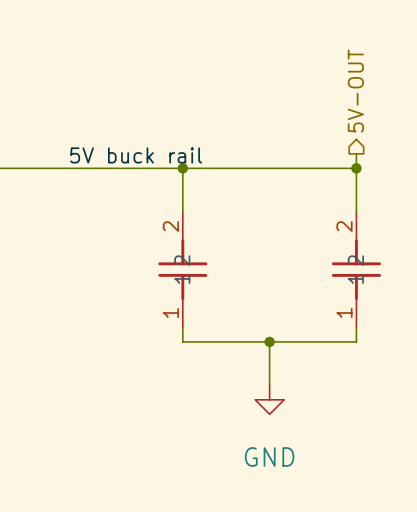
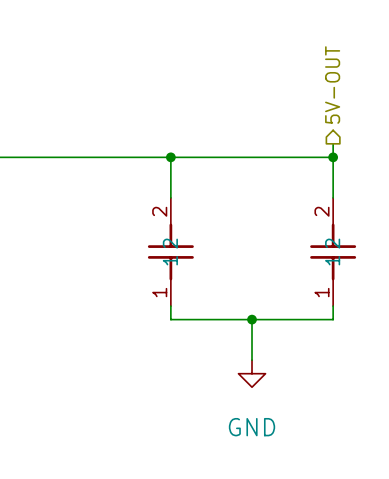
label: 5V buck rail (136, 155) -> none

